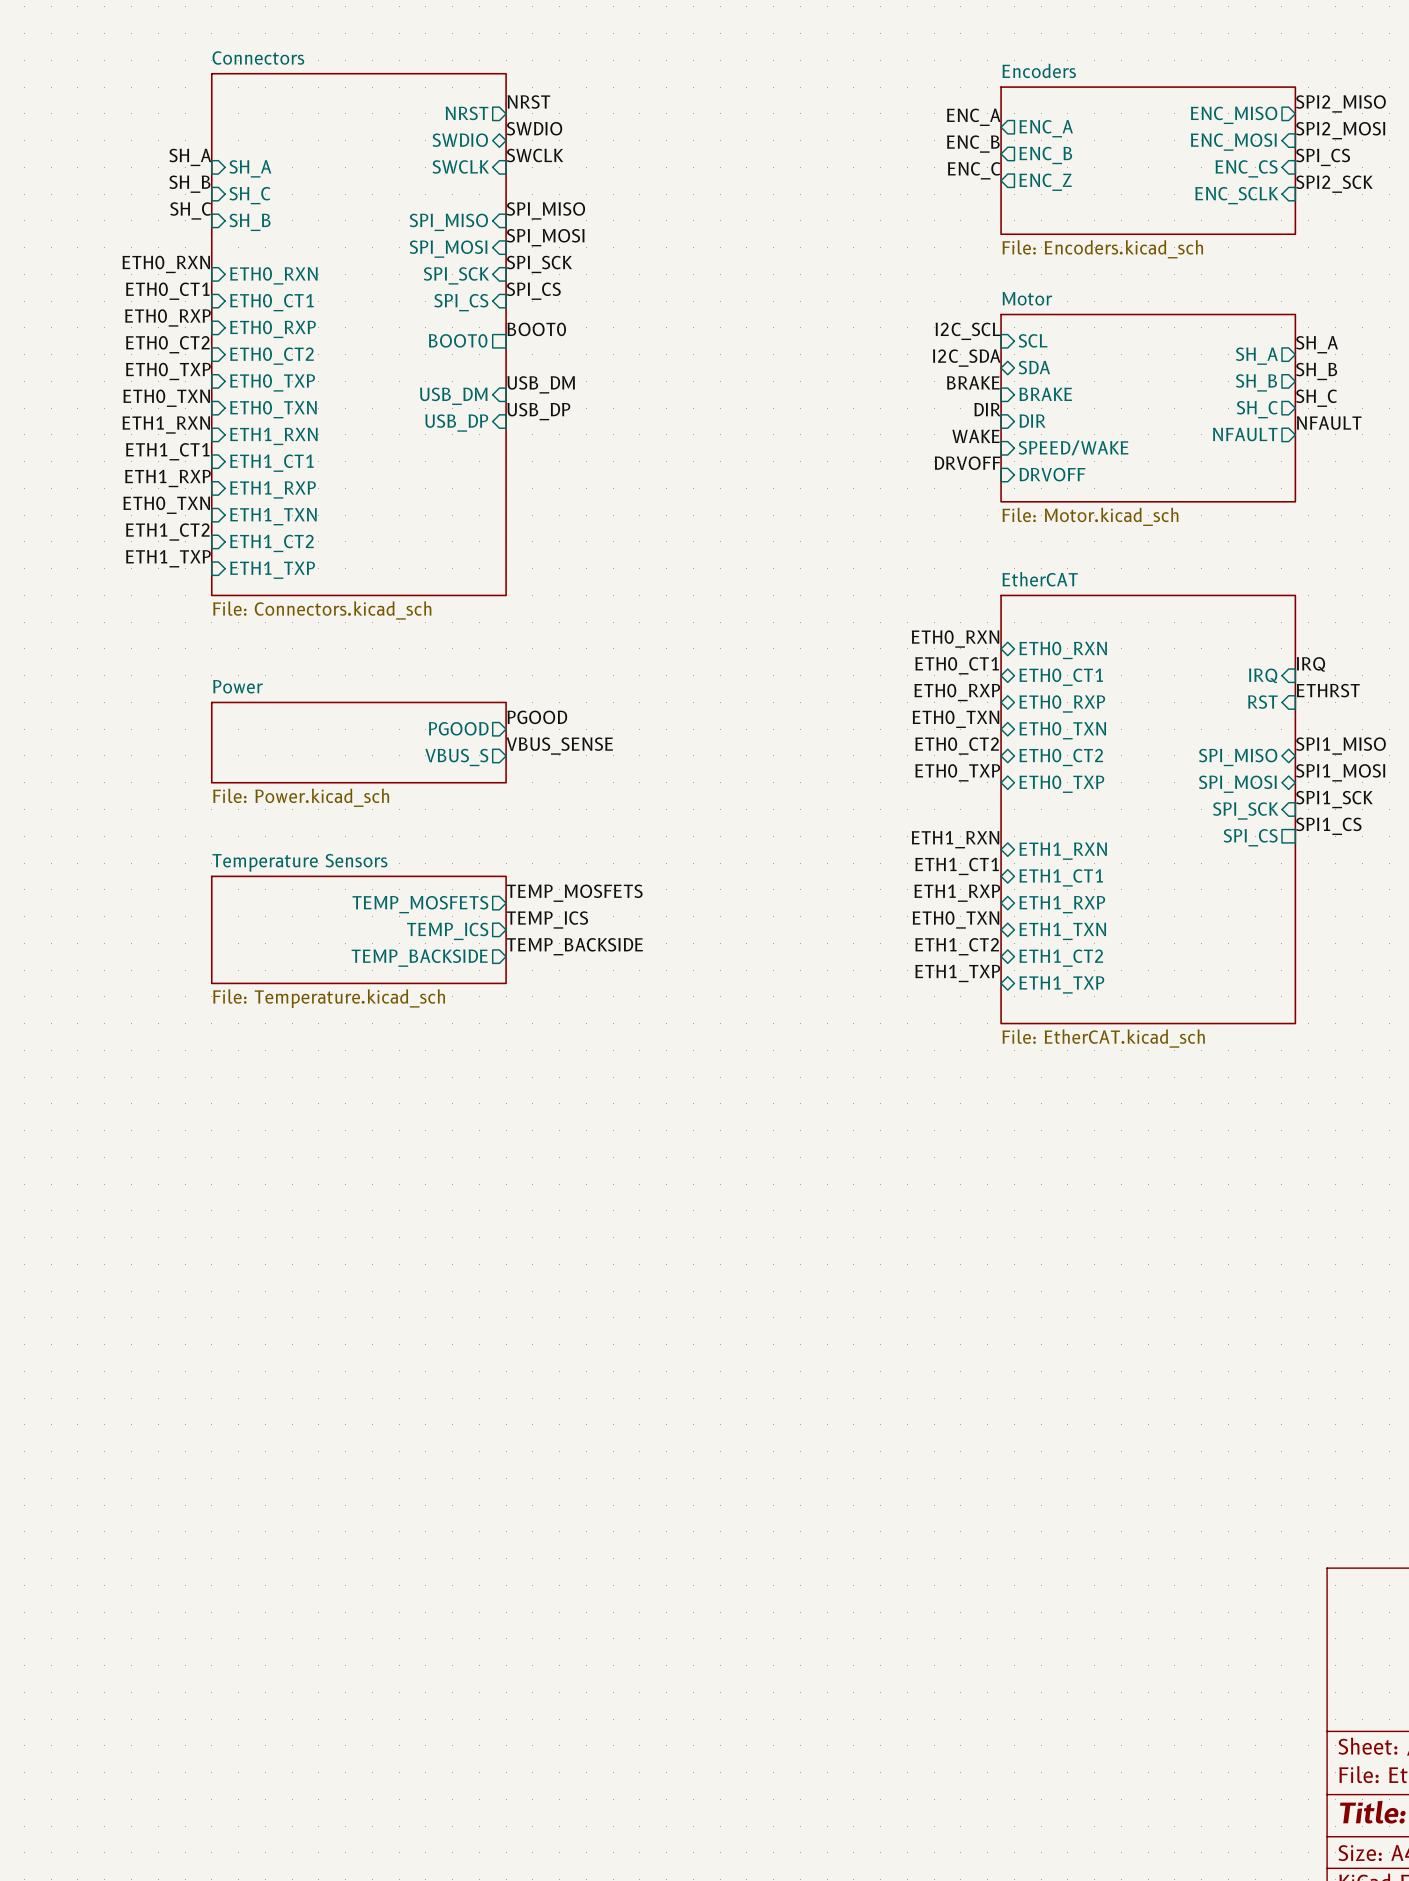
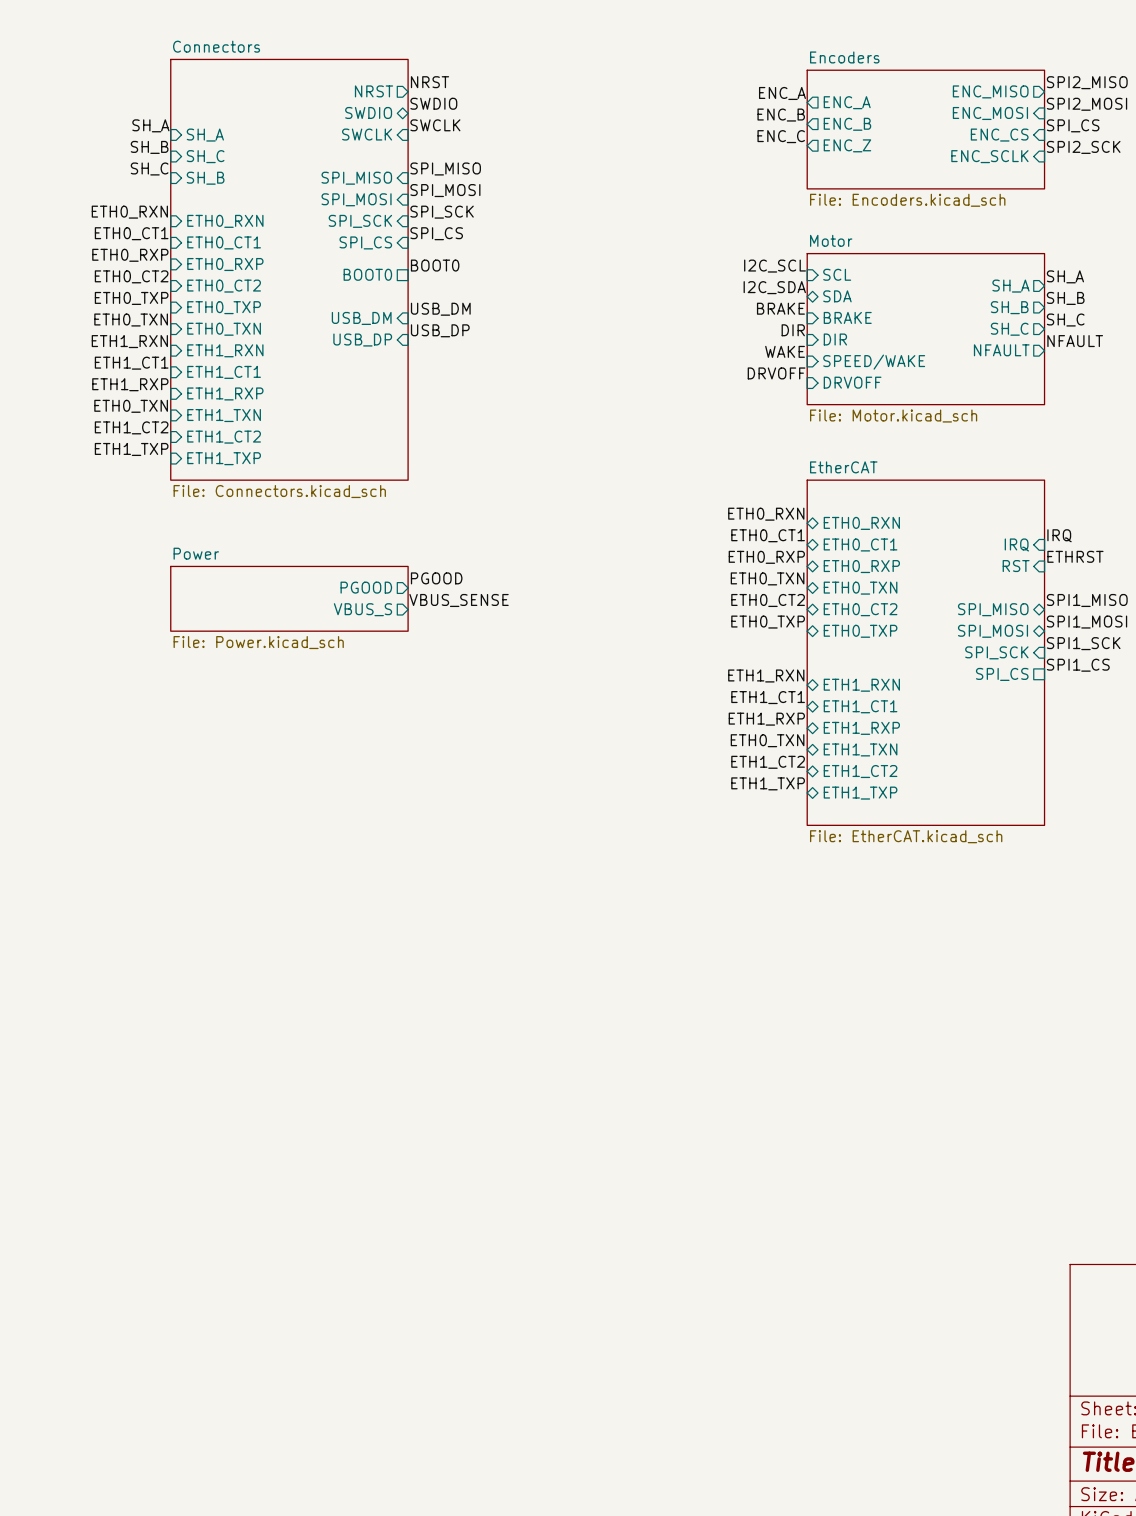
label: TEMP_MOSFETS (574, 893) -> none
sheet pin: TEMP_MOSFETS (420, 904) -> none
label: TEMP_ICS (547, 919) -> none
sheet Temperature Sensors: File: Temperature.kicad_sch (358, 929) -> none
sheet pin: TEMP_ICS (447, 931) -> none
label: TEMP_BACKSIDE (574, 946) -> none
sheet pin: TEMP_BACKSIDE (419, 958) -> none

